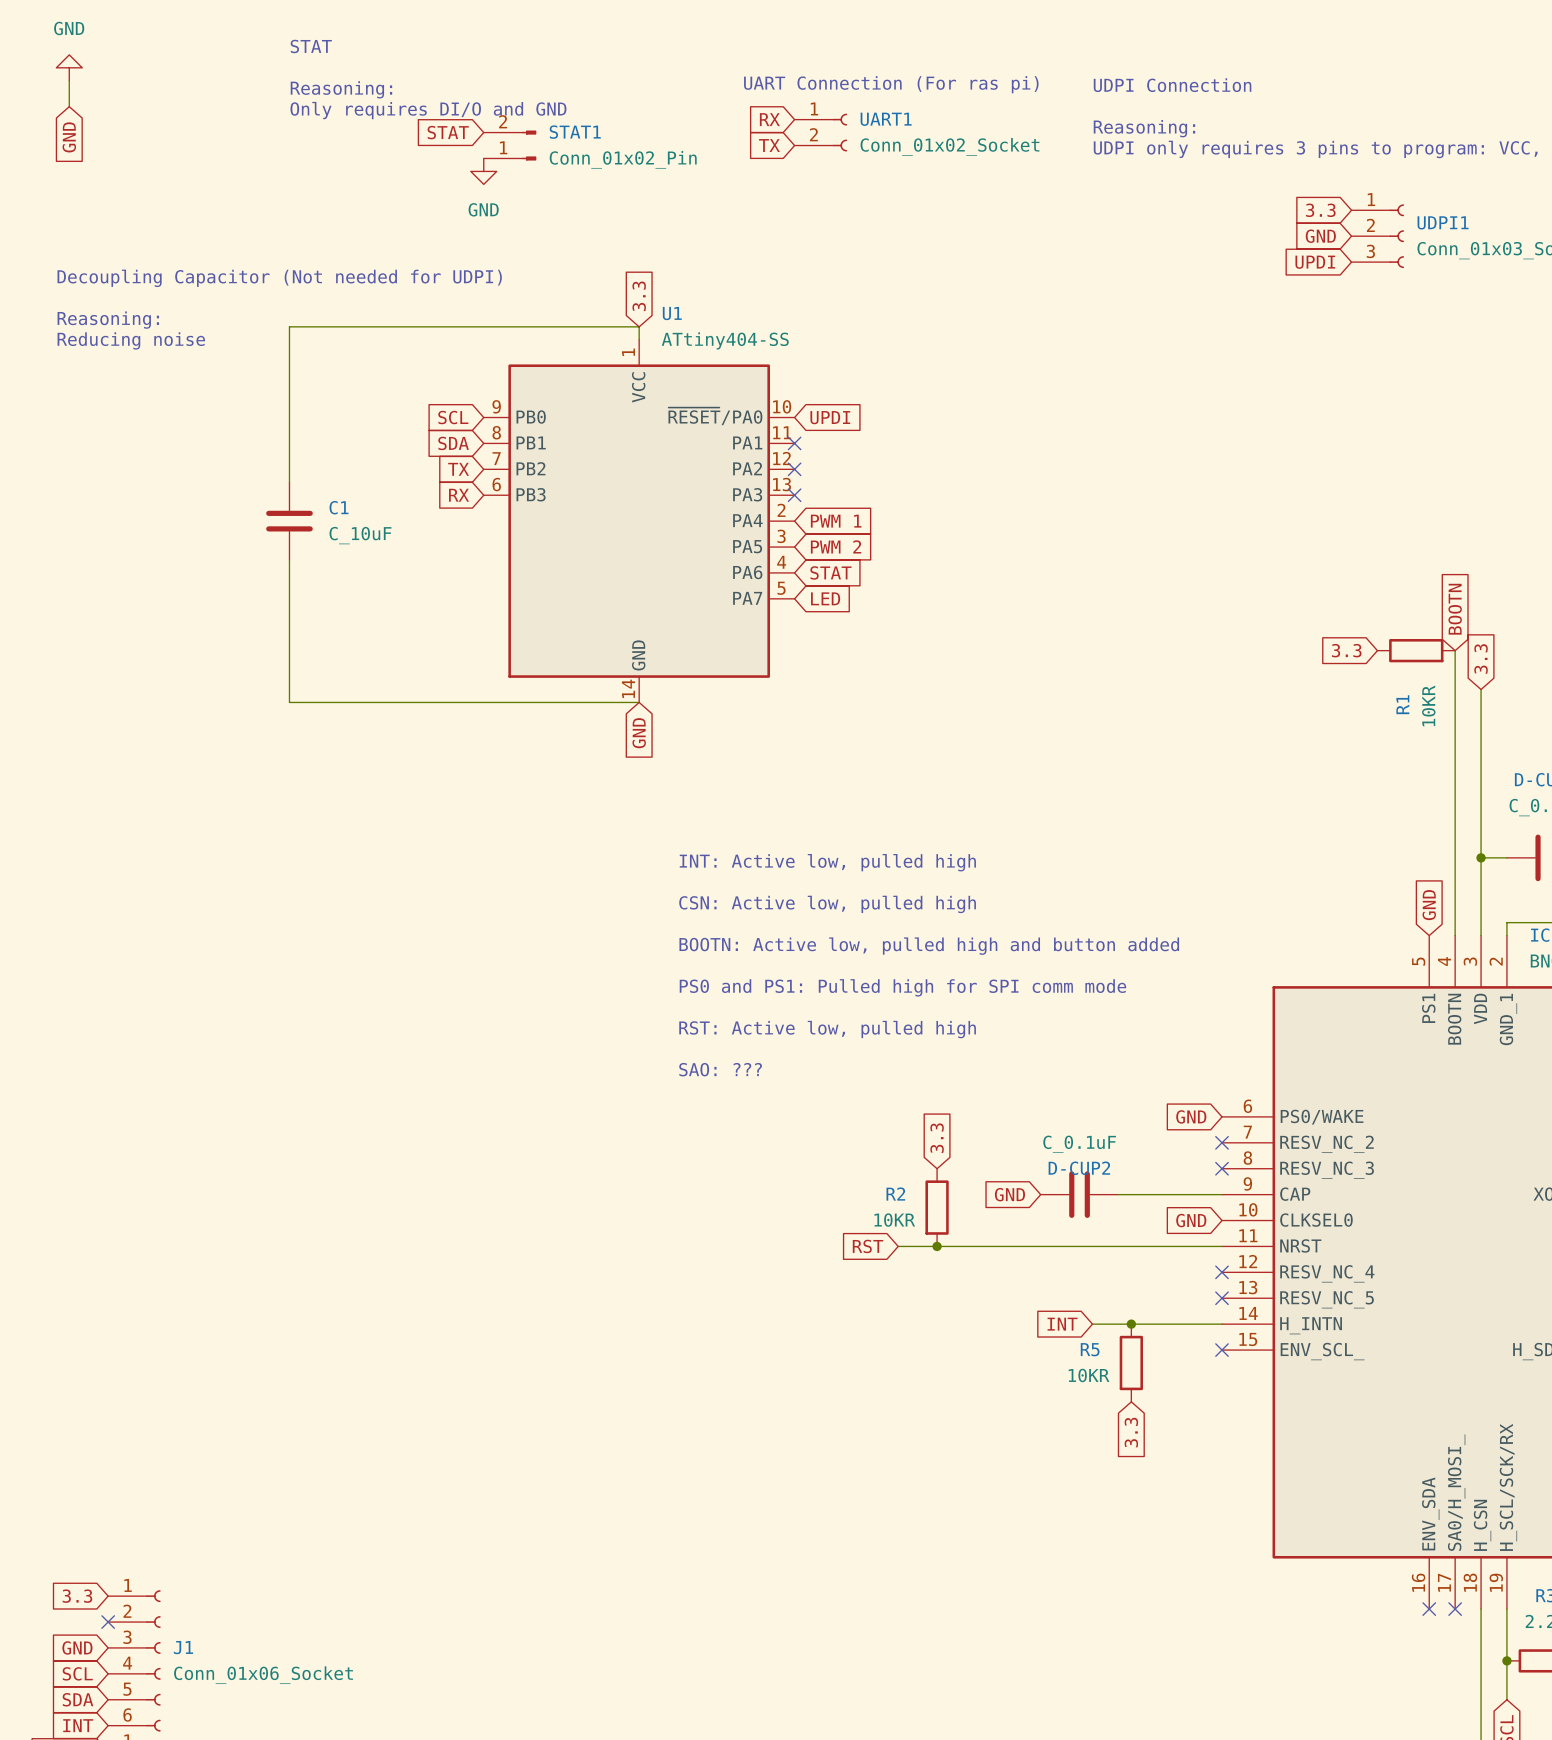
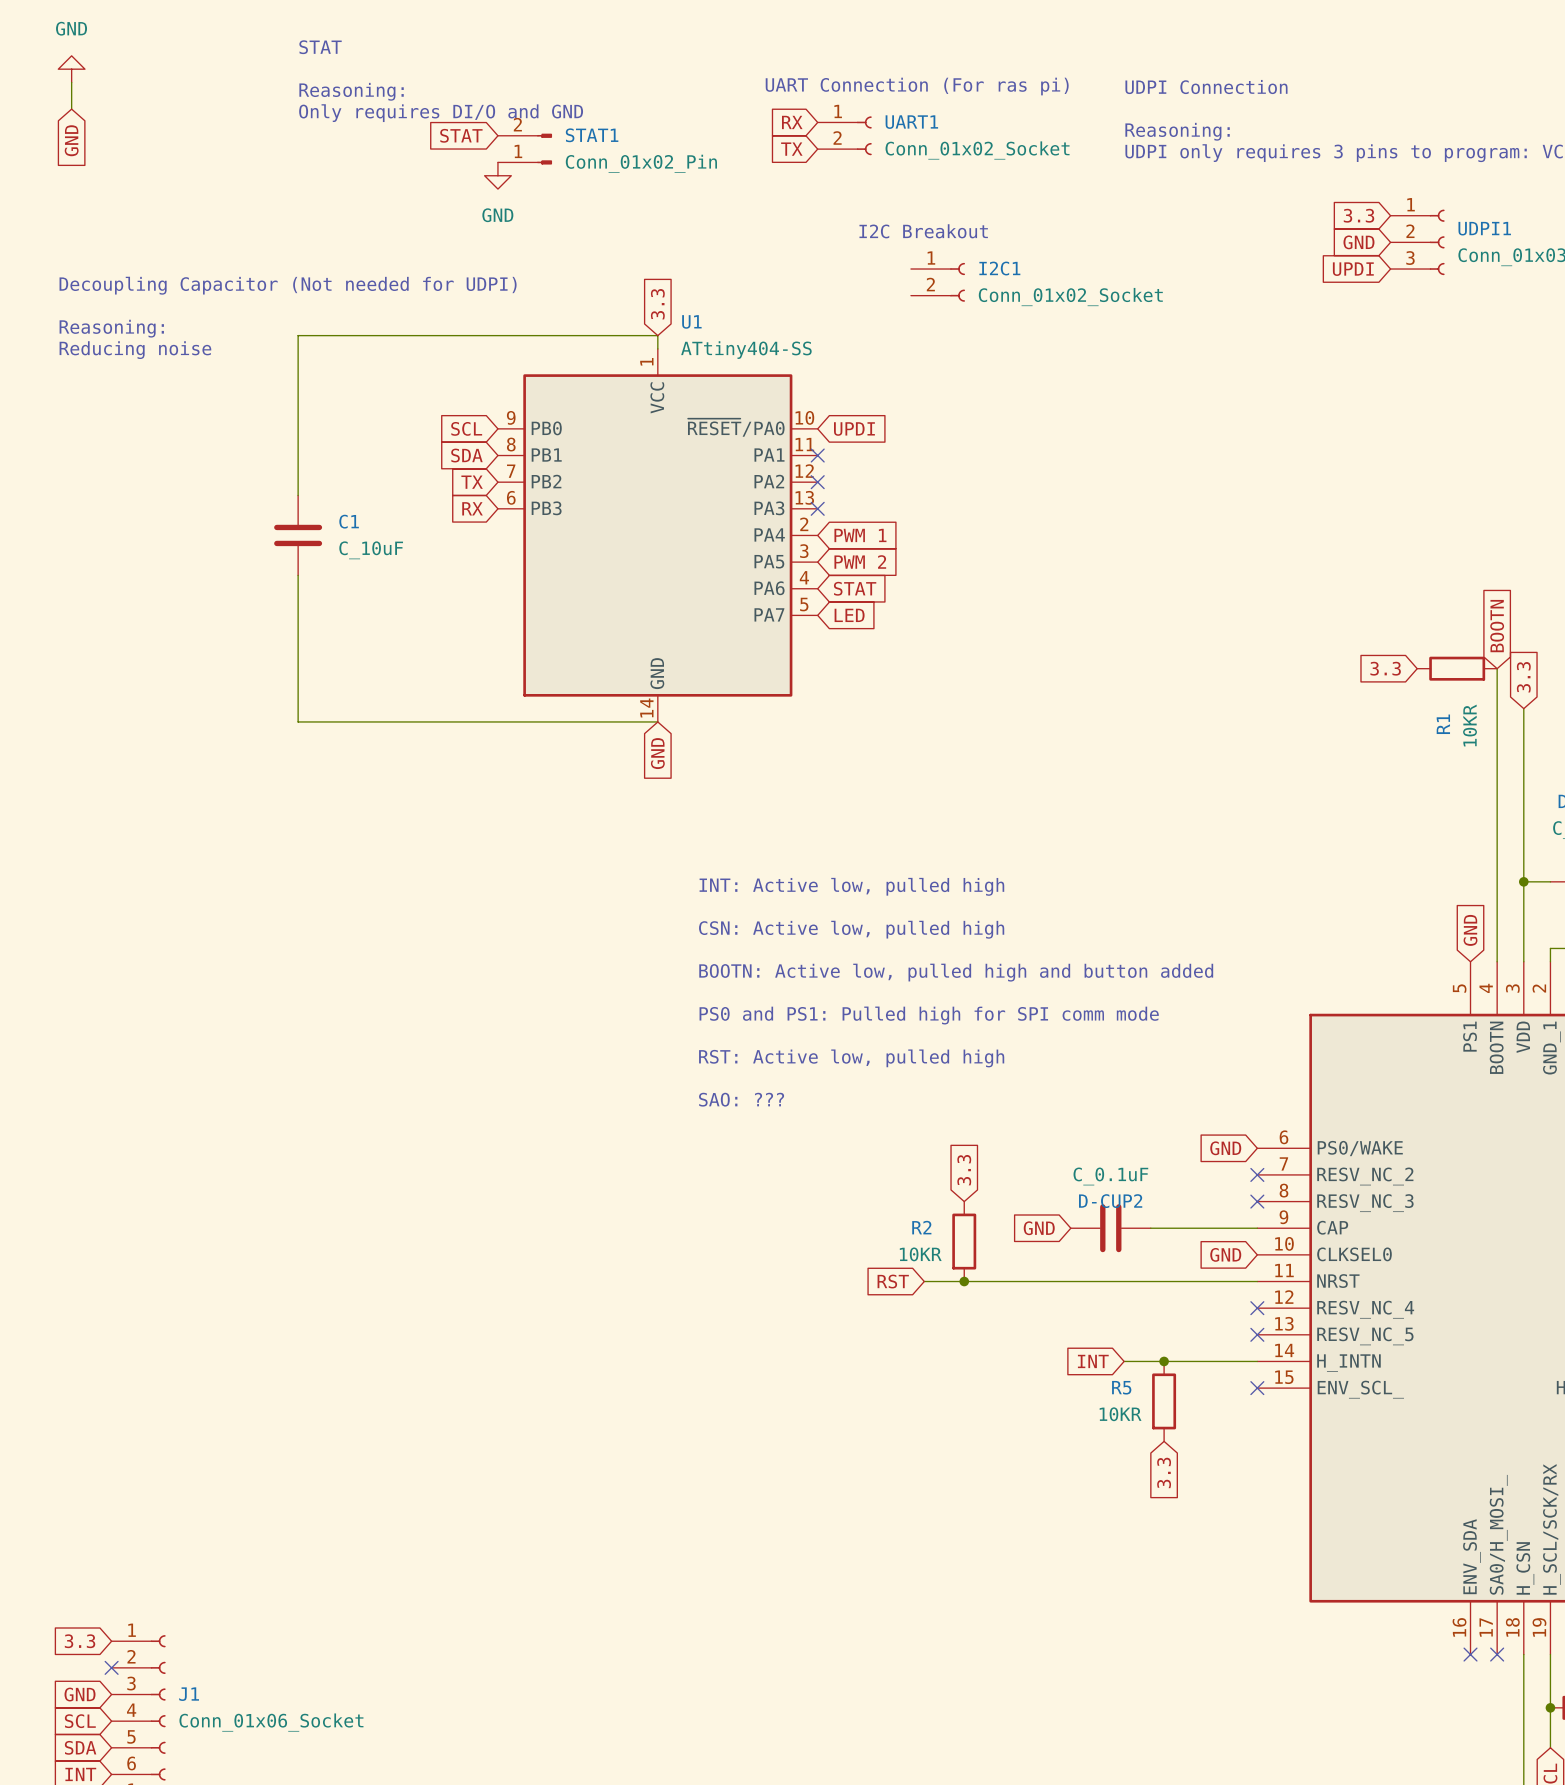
text: none -> I2C Breakout (923, 231)
I2C1: none -> Conn_01x02_Socket (938, 282)

